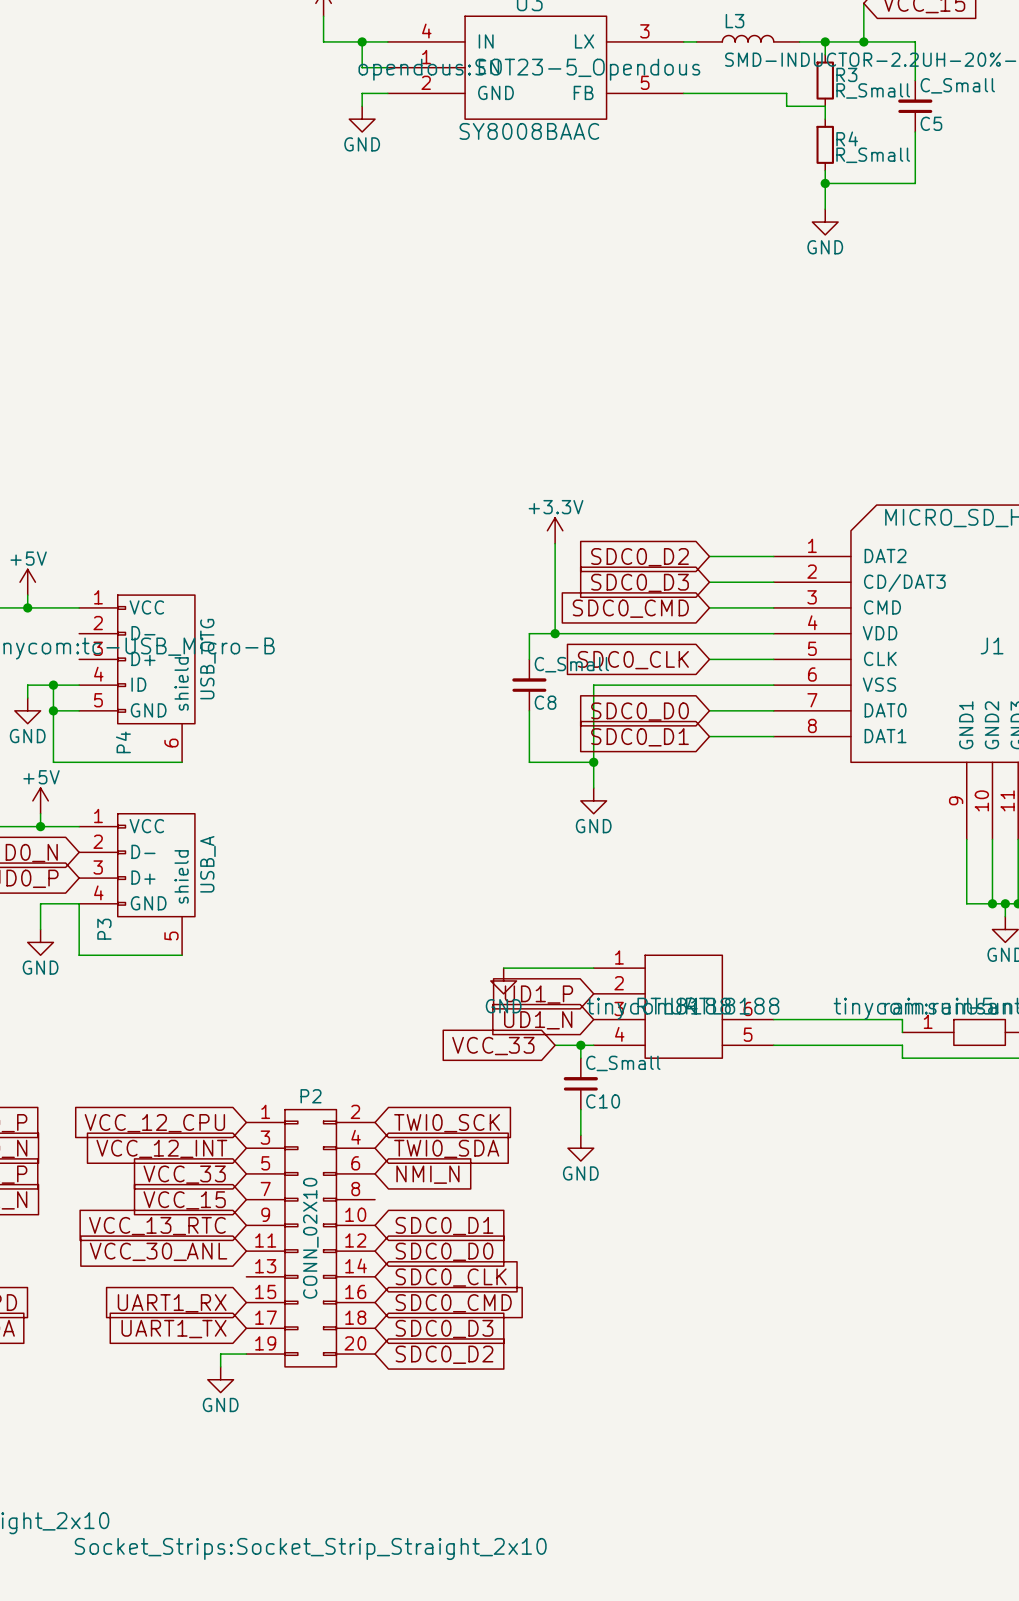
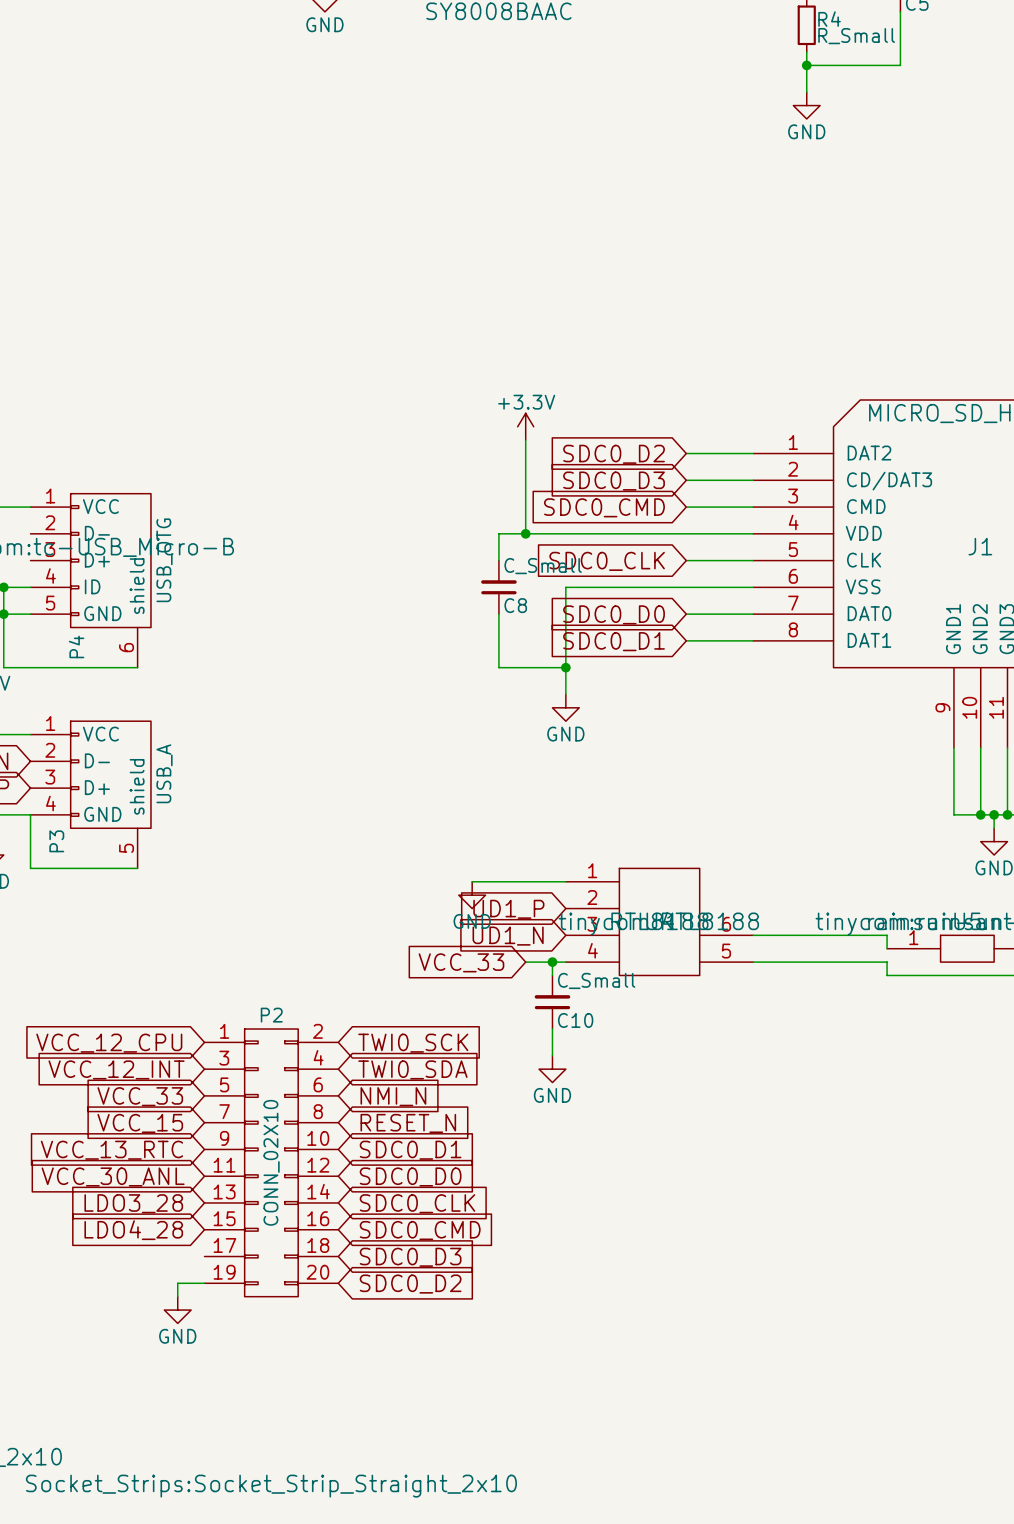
global label: none -> RESET_N (408, 1123)
global label: none -> LDO3_28 (133, 1203)
global label: UART1_RX (172, 1303) -> LDO4_28 (133, 1230)
global label: UART1_TX (173, 1329) -> none

